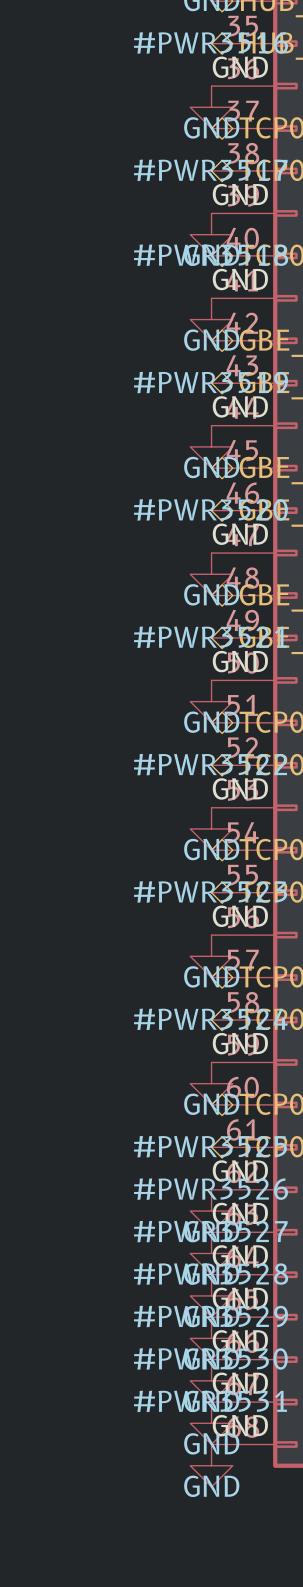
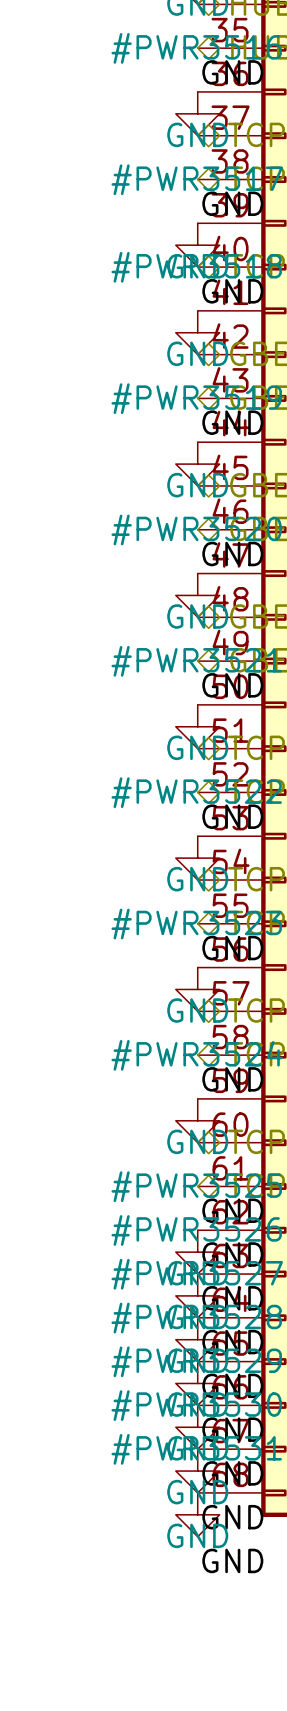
label: none -> GND (232, 1517)
label: none -> GND (232, 1560)

